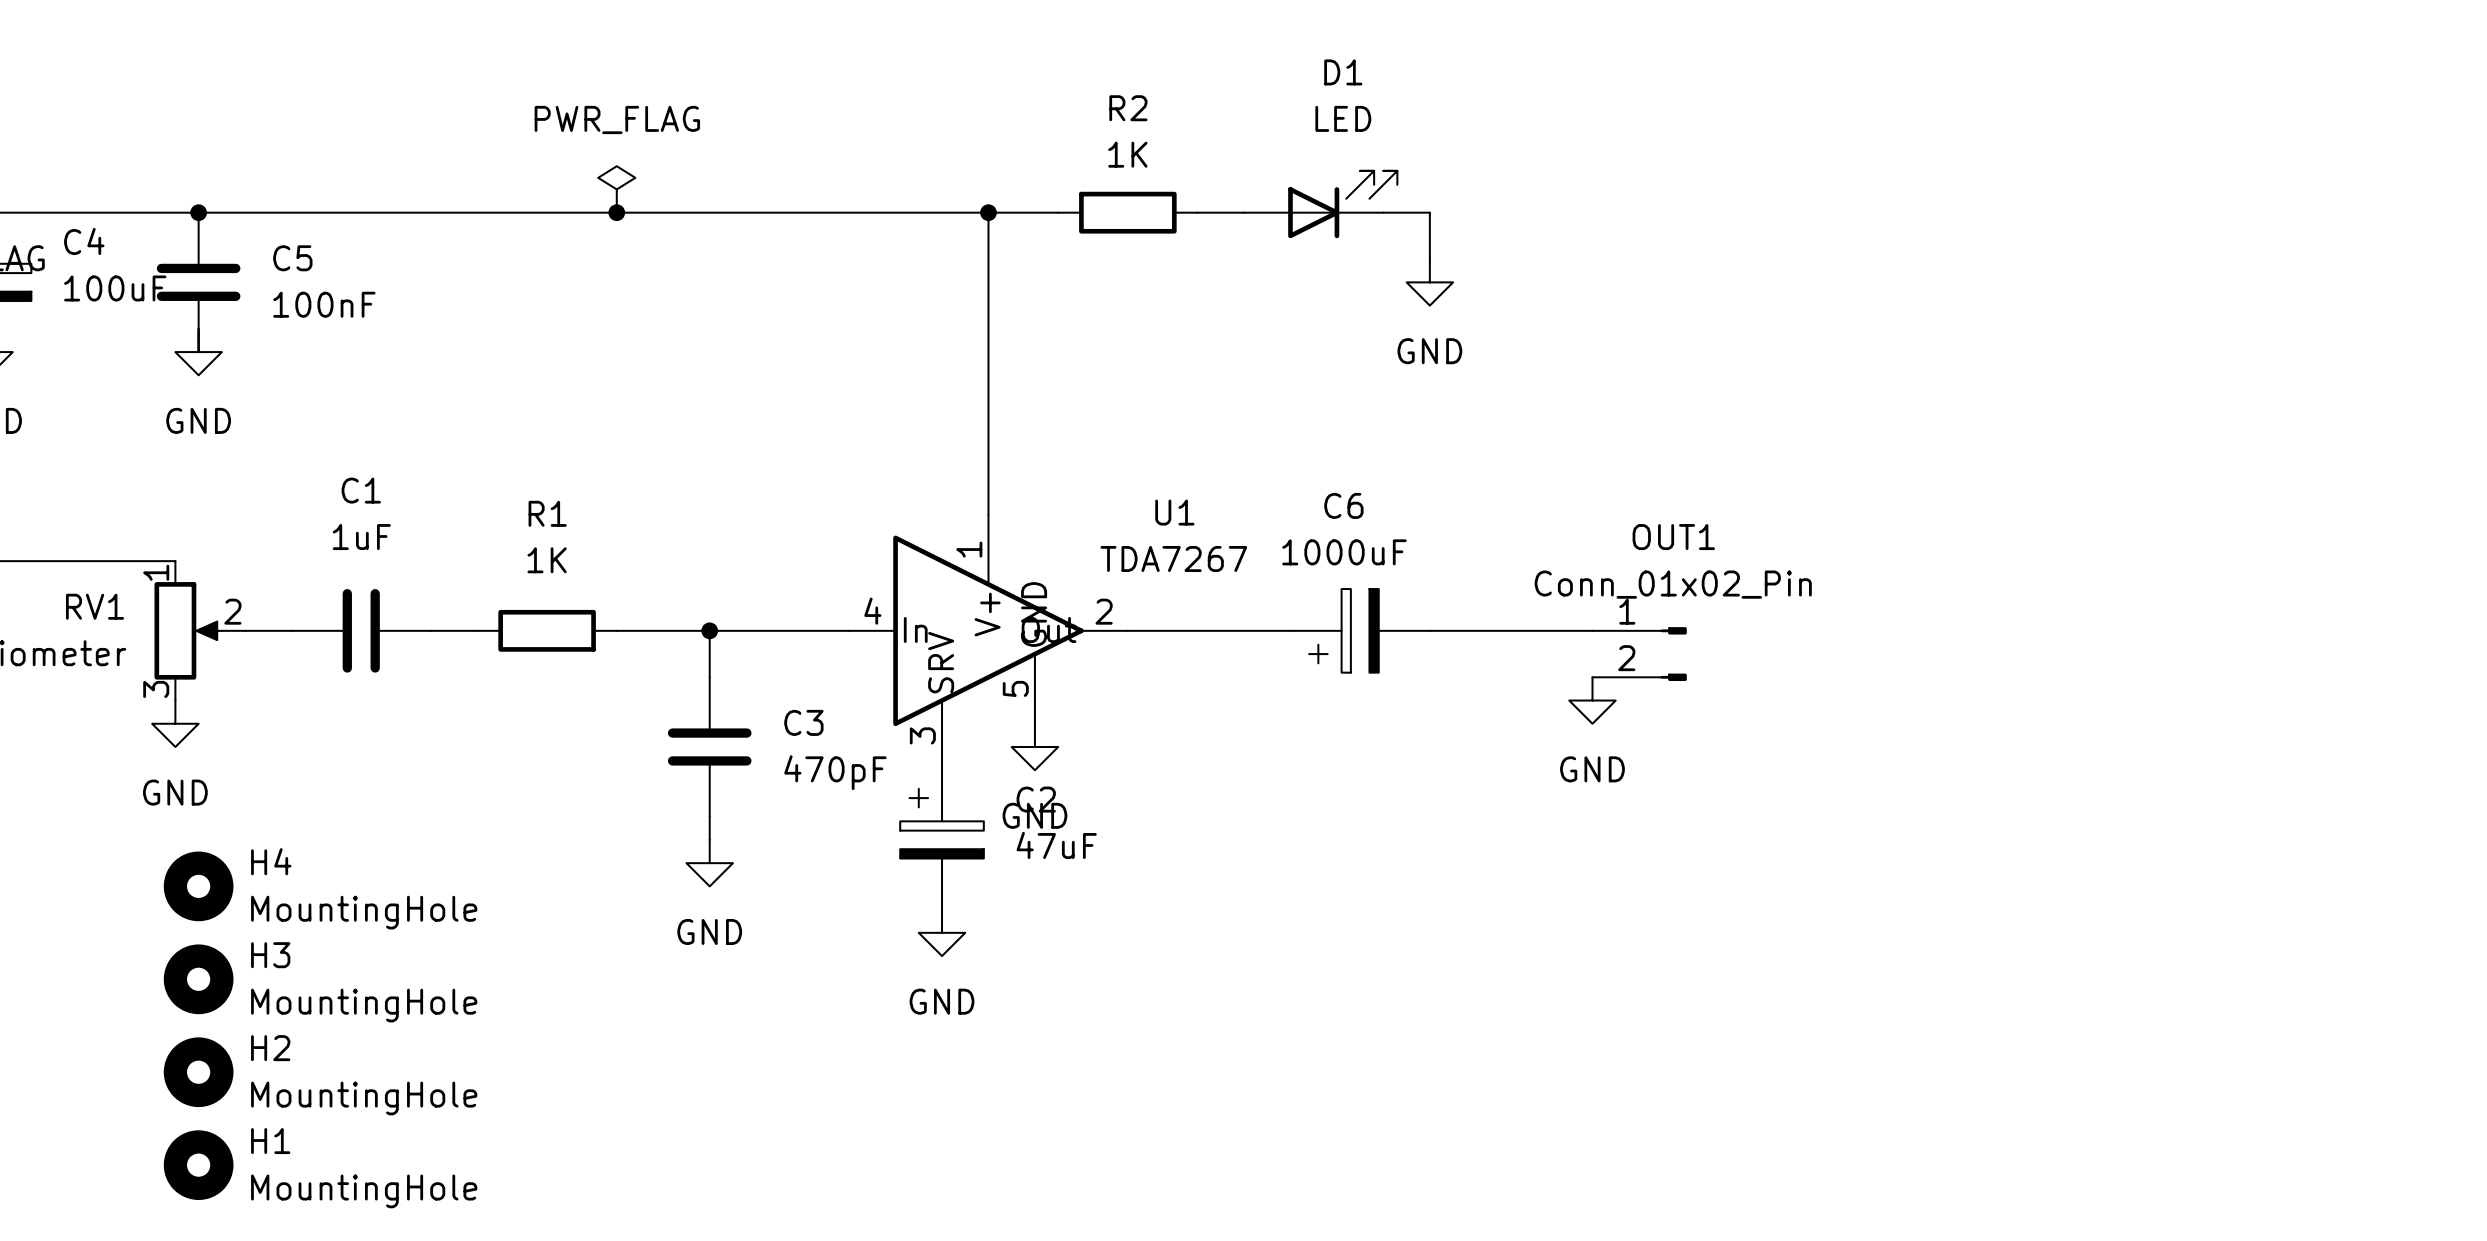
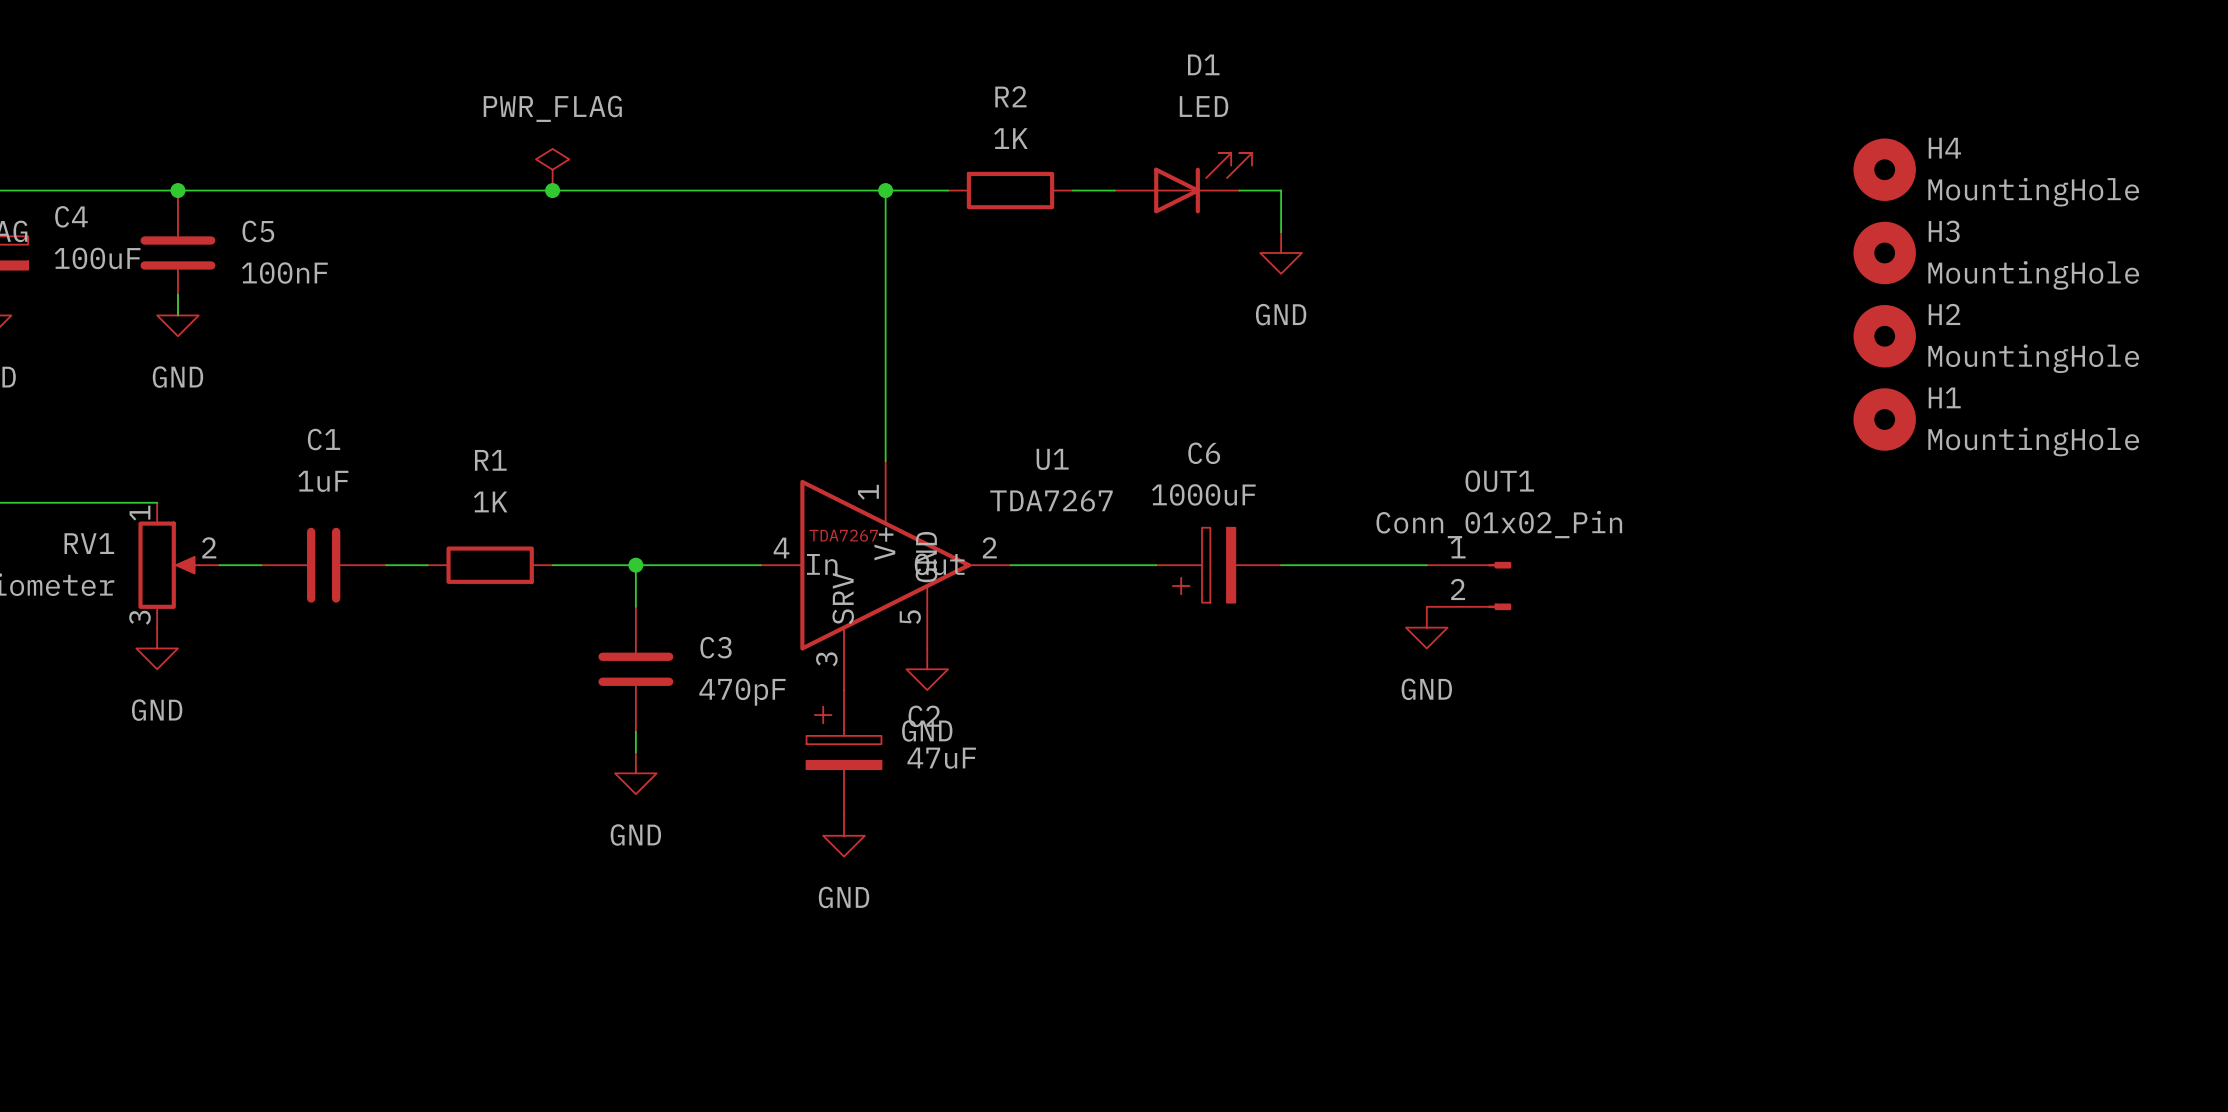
U1 text: none -> TDA7267 (843, 535)
H4 position: (198, 886) -> (1884, 169)
H3 position: (198, 979) -> (1884, 252)
H2 position: (198, 1072) -> (1884, 336)
H1 position: (198, 1165) -> (1884, 419)

